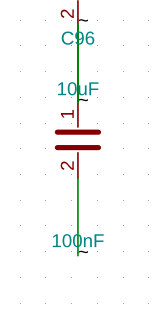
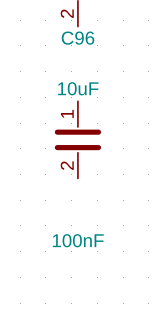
label: ~ (83, 20) -> none
wire: (77, 24) (77, 103) -> none
label: ~ (83, 99) -> none
wire: (77, 178) (77, 255) -> none
label: ~ (83, 251) -> none

